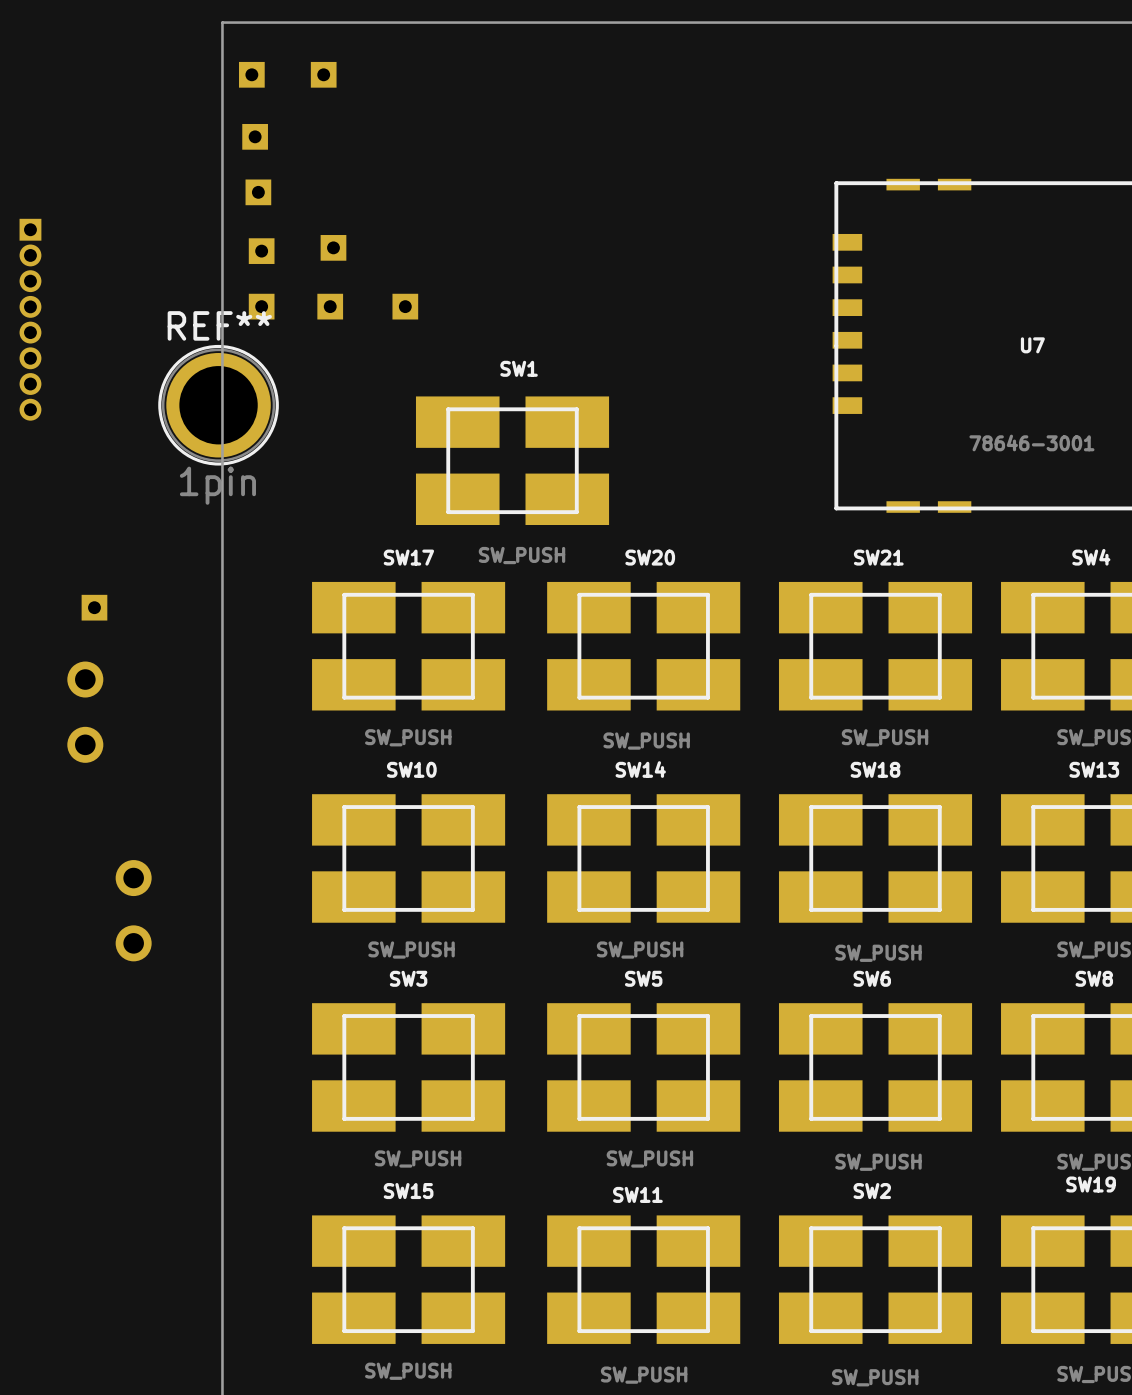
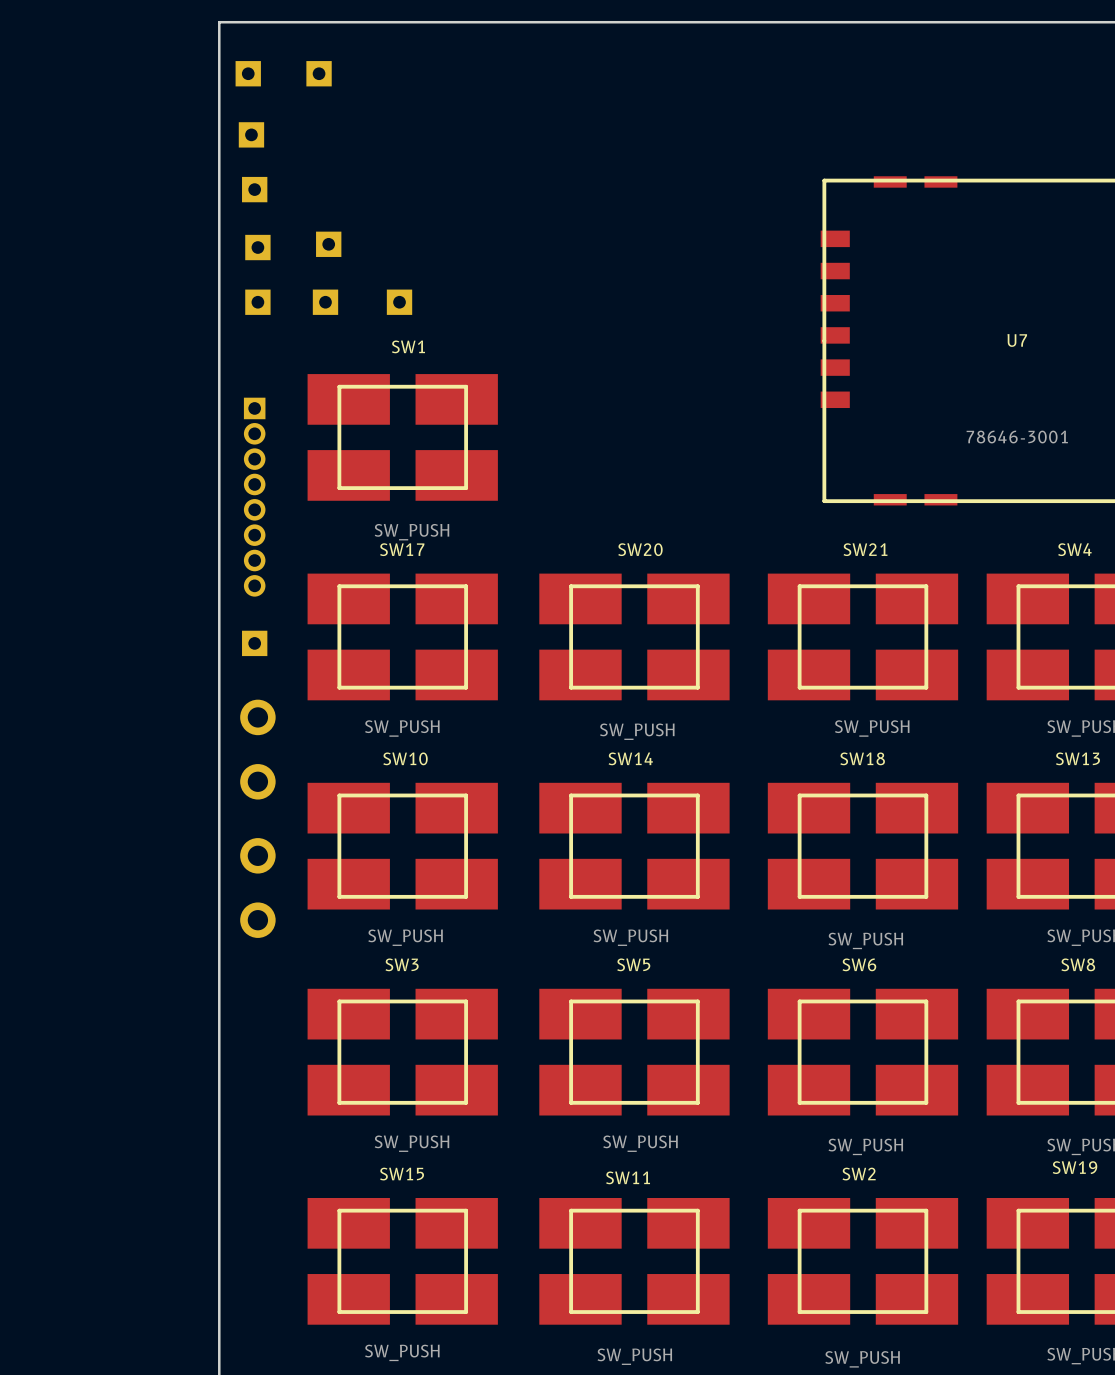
part position: (30, 319) -> (254, 497)
REF**: 1pin (218, 405) -> none
SW1 position: (512, 460) -> (402, 437)
part position: (94, 607) -> (254, 643)
part: (85, 712) -> none
part: none -> (257, 749)
part: none -> (257, 888)
part: (133, 910) -> none

